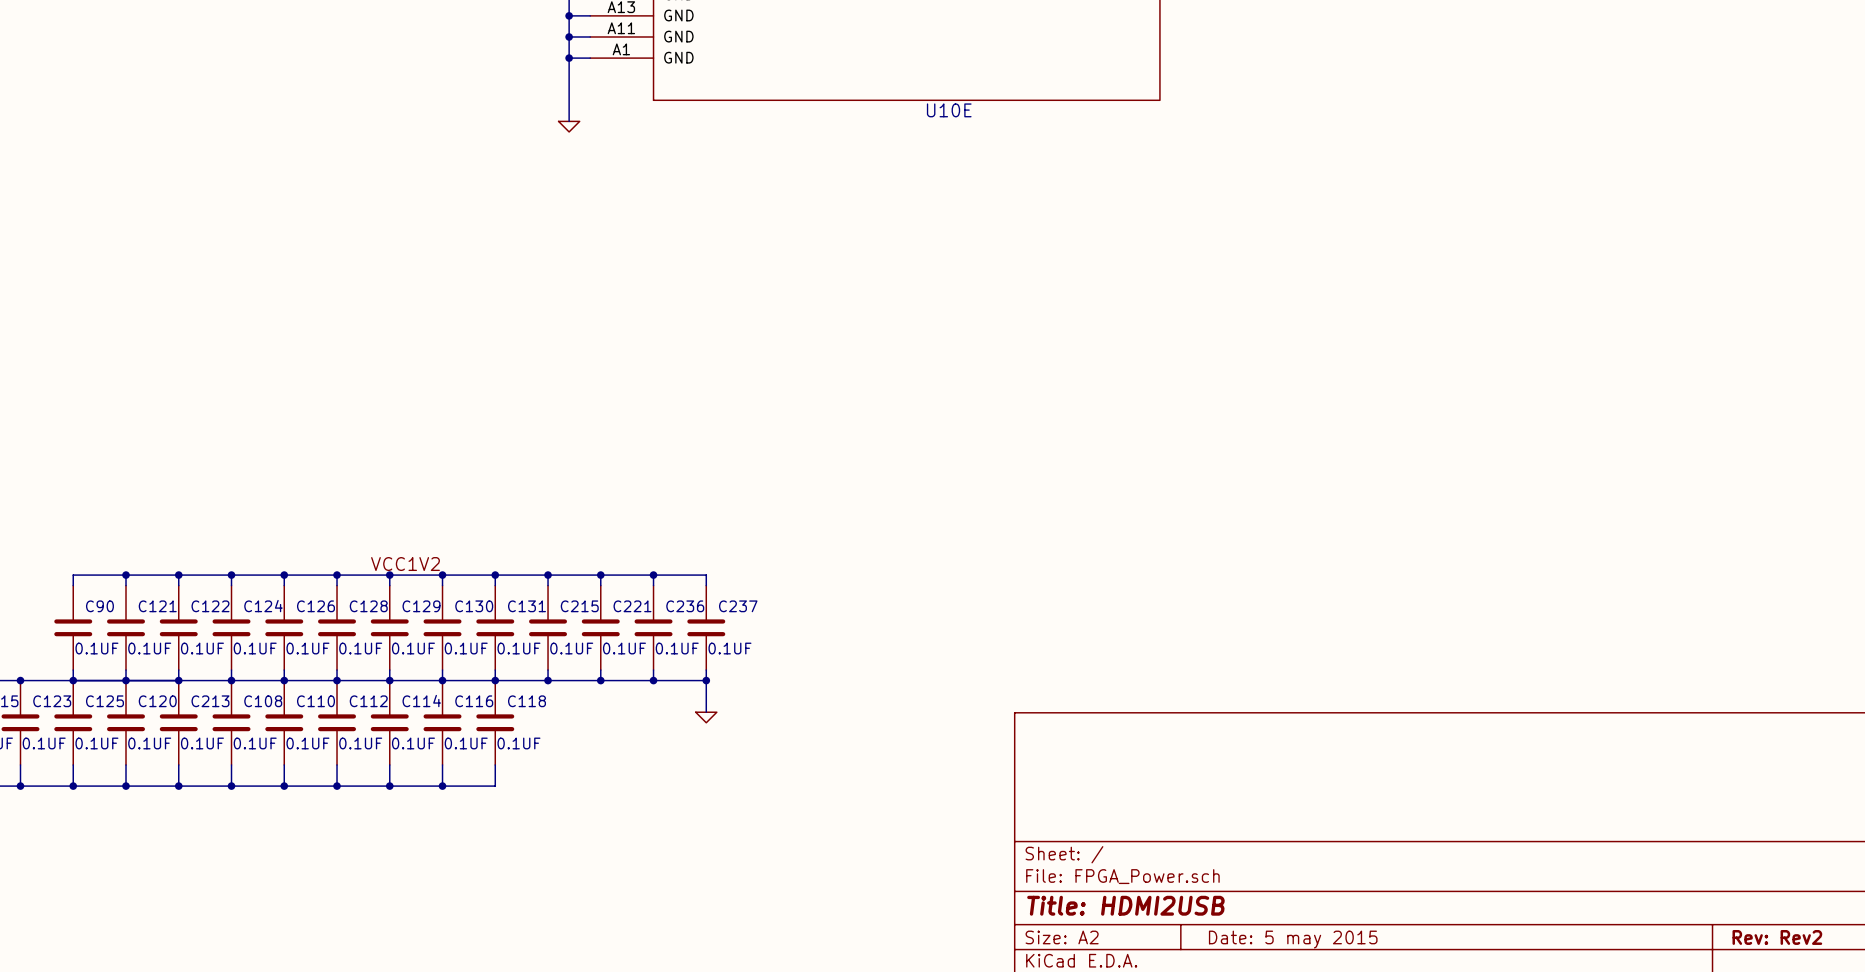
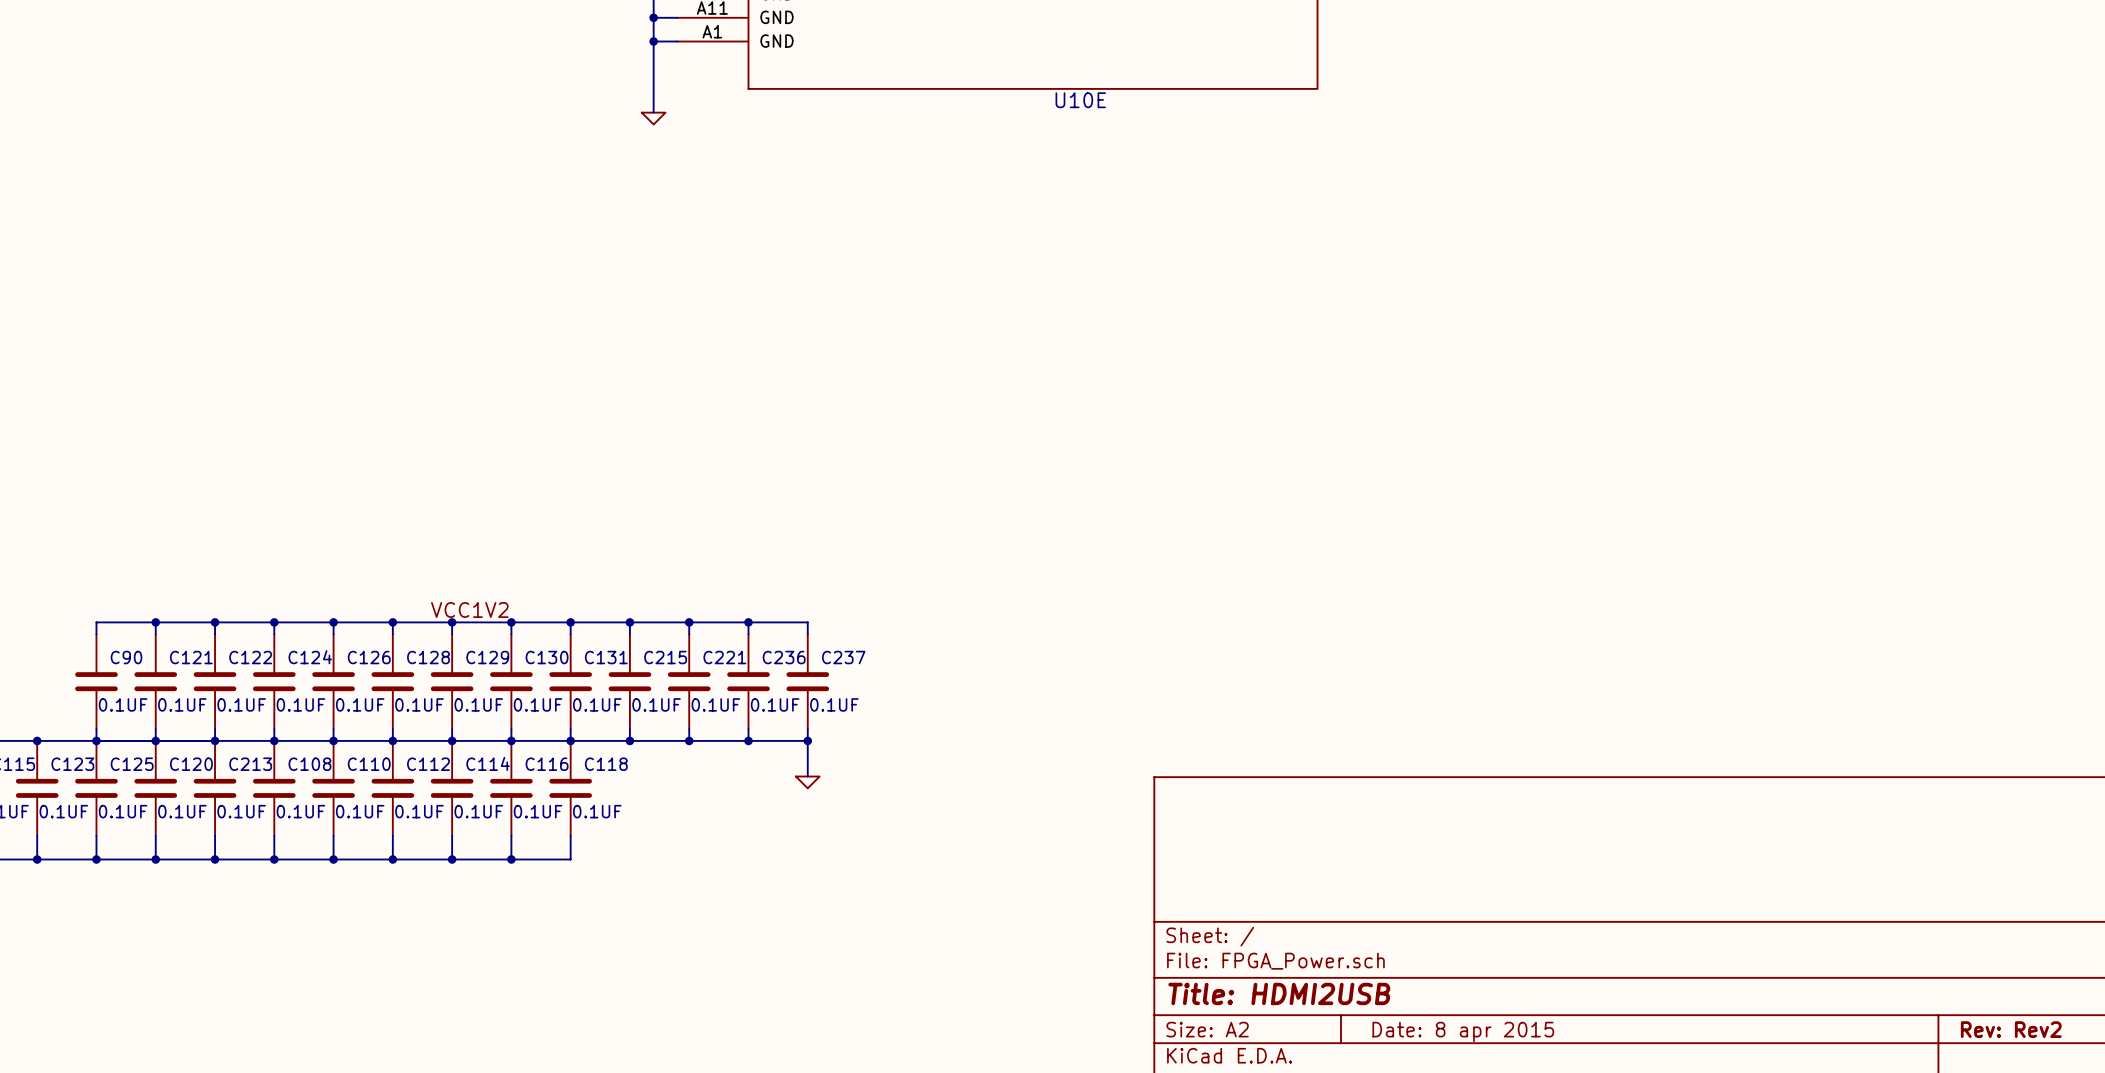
title block: Date: 5 may 2015 (1293, 939) -> Date: 8 apr 2015 (1463, 1031)

